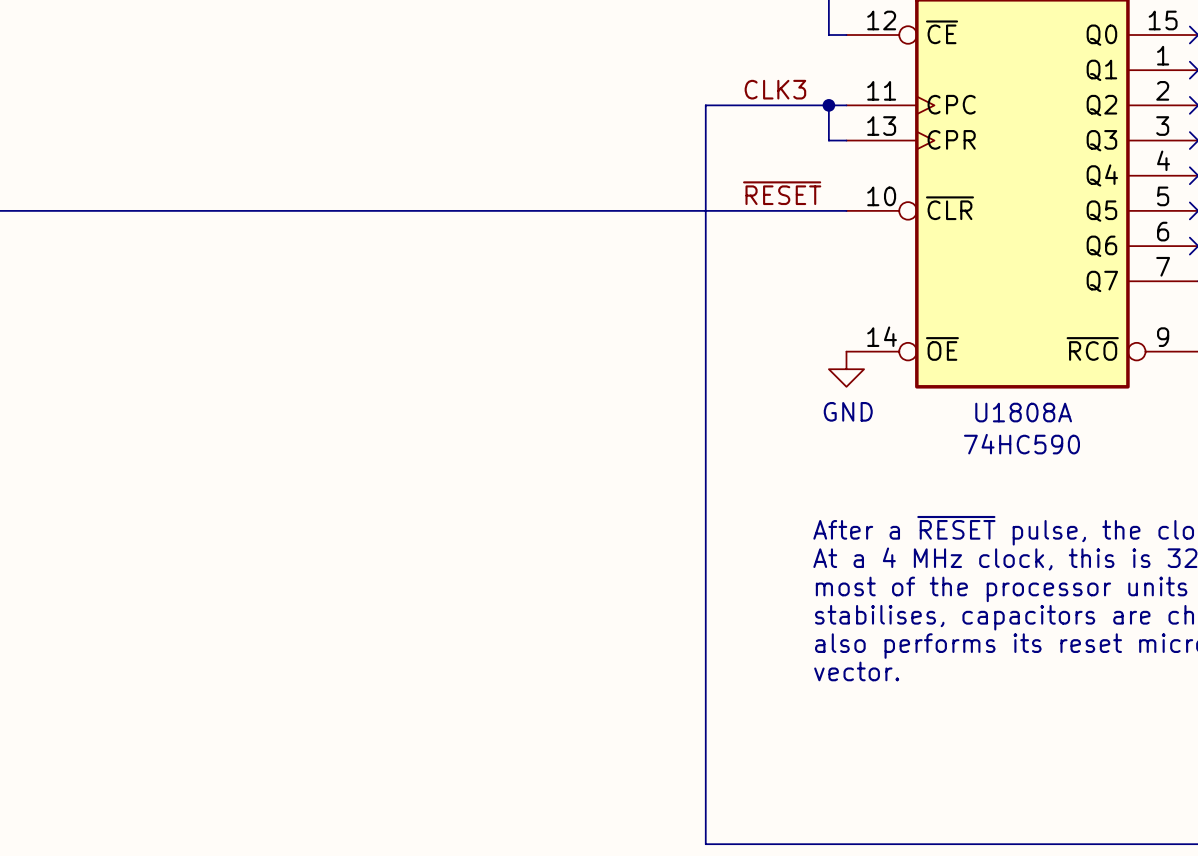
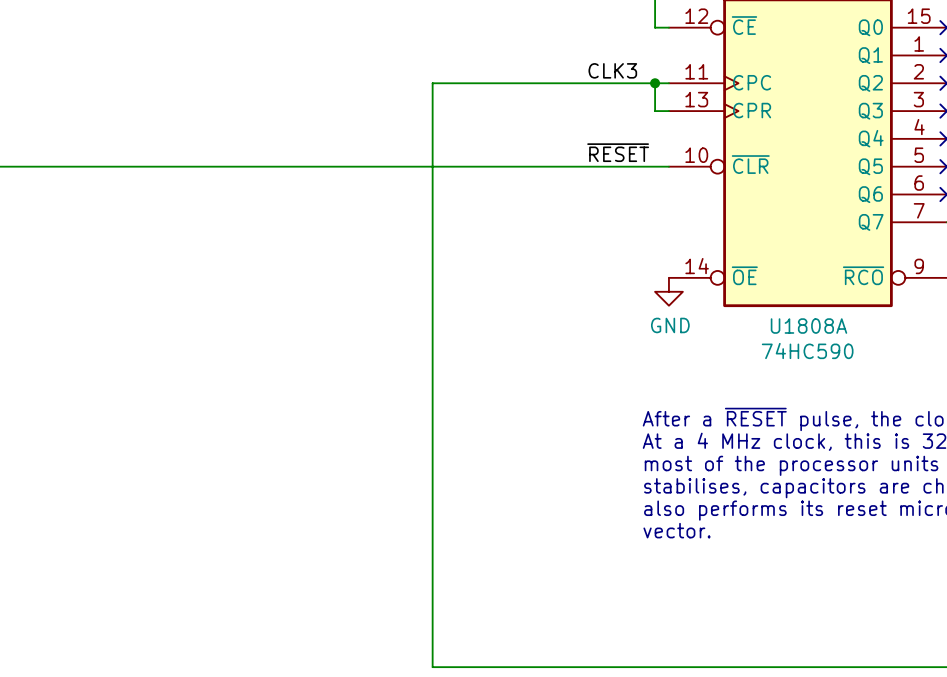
wire: (705, 105) (705, 844) -> (557, 83) (432, 83) (432, 667) (557, 667)

